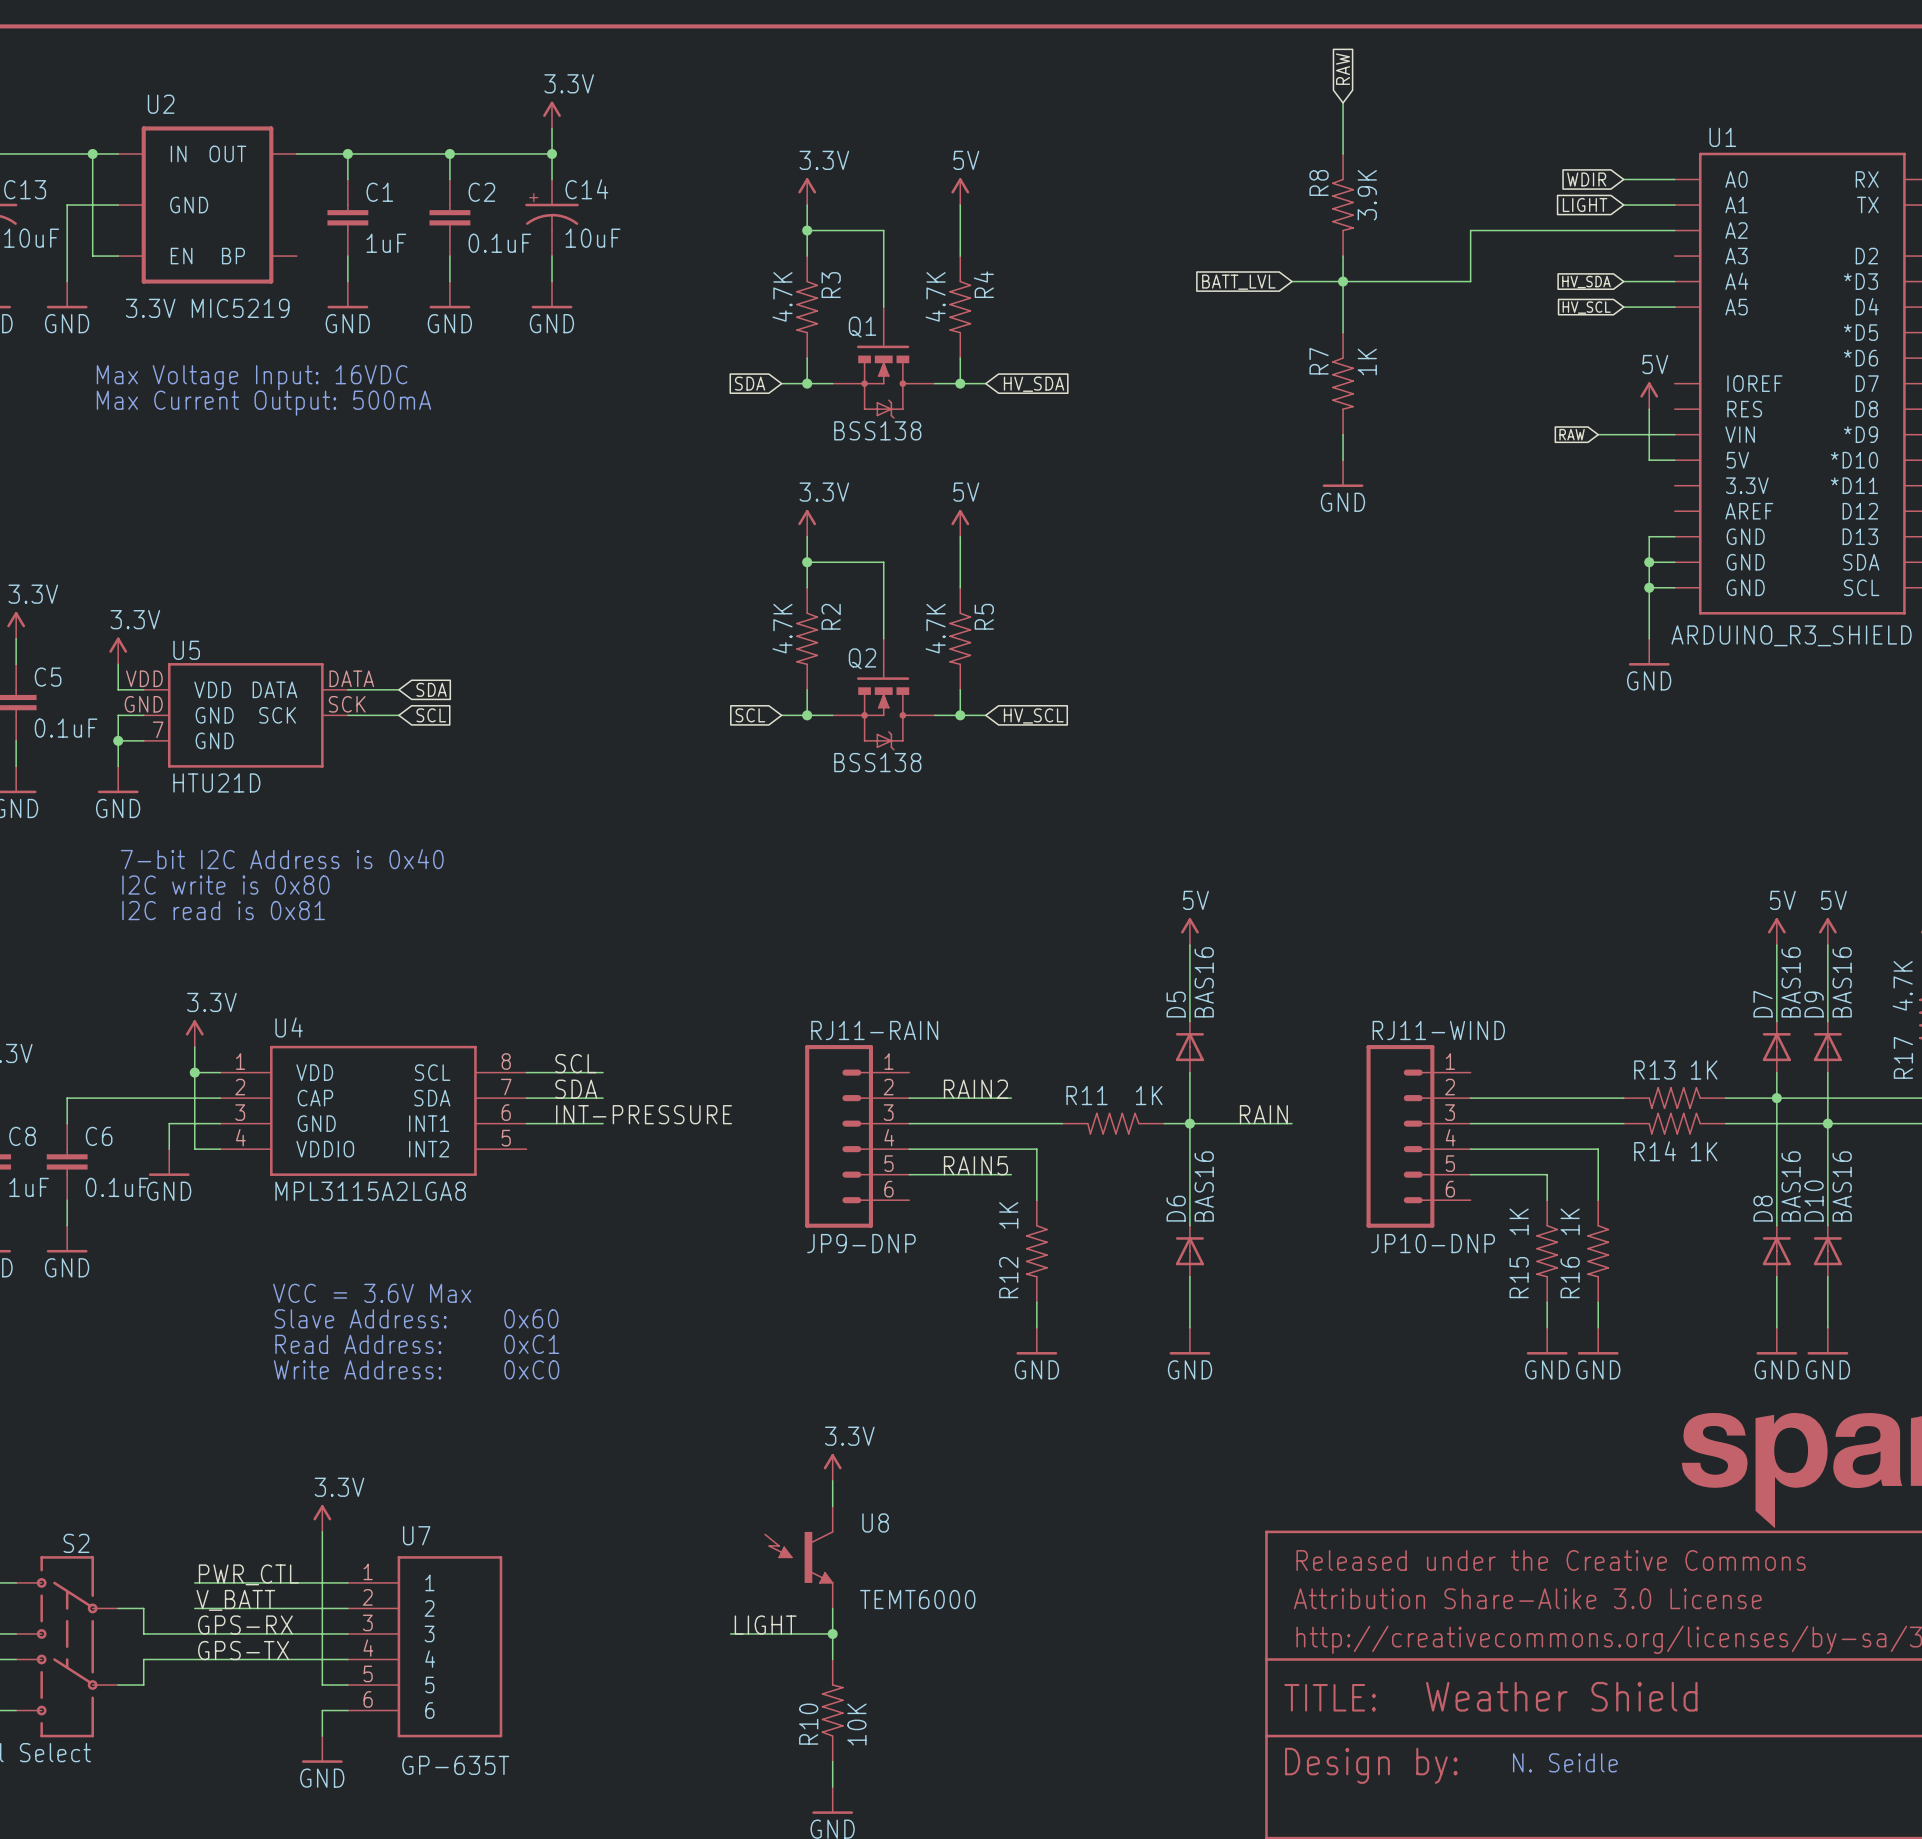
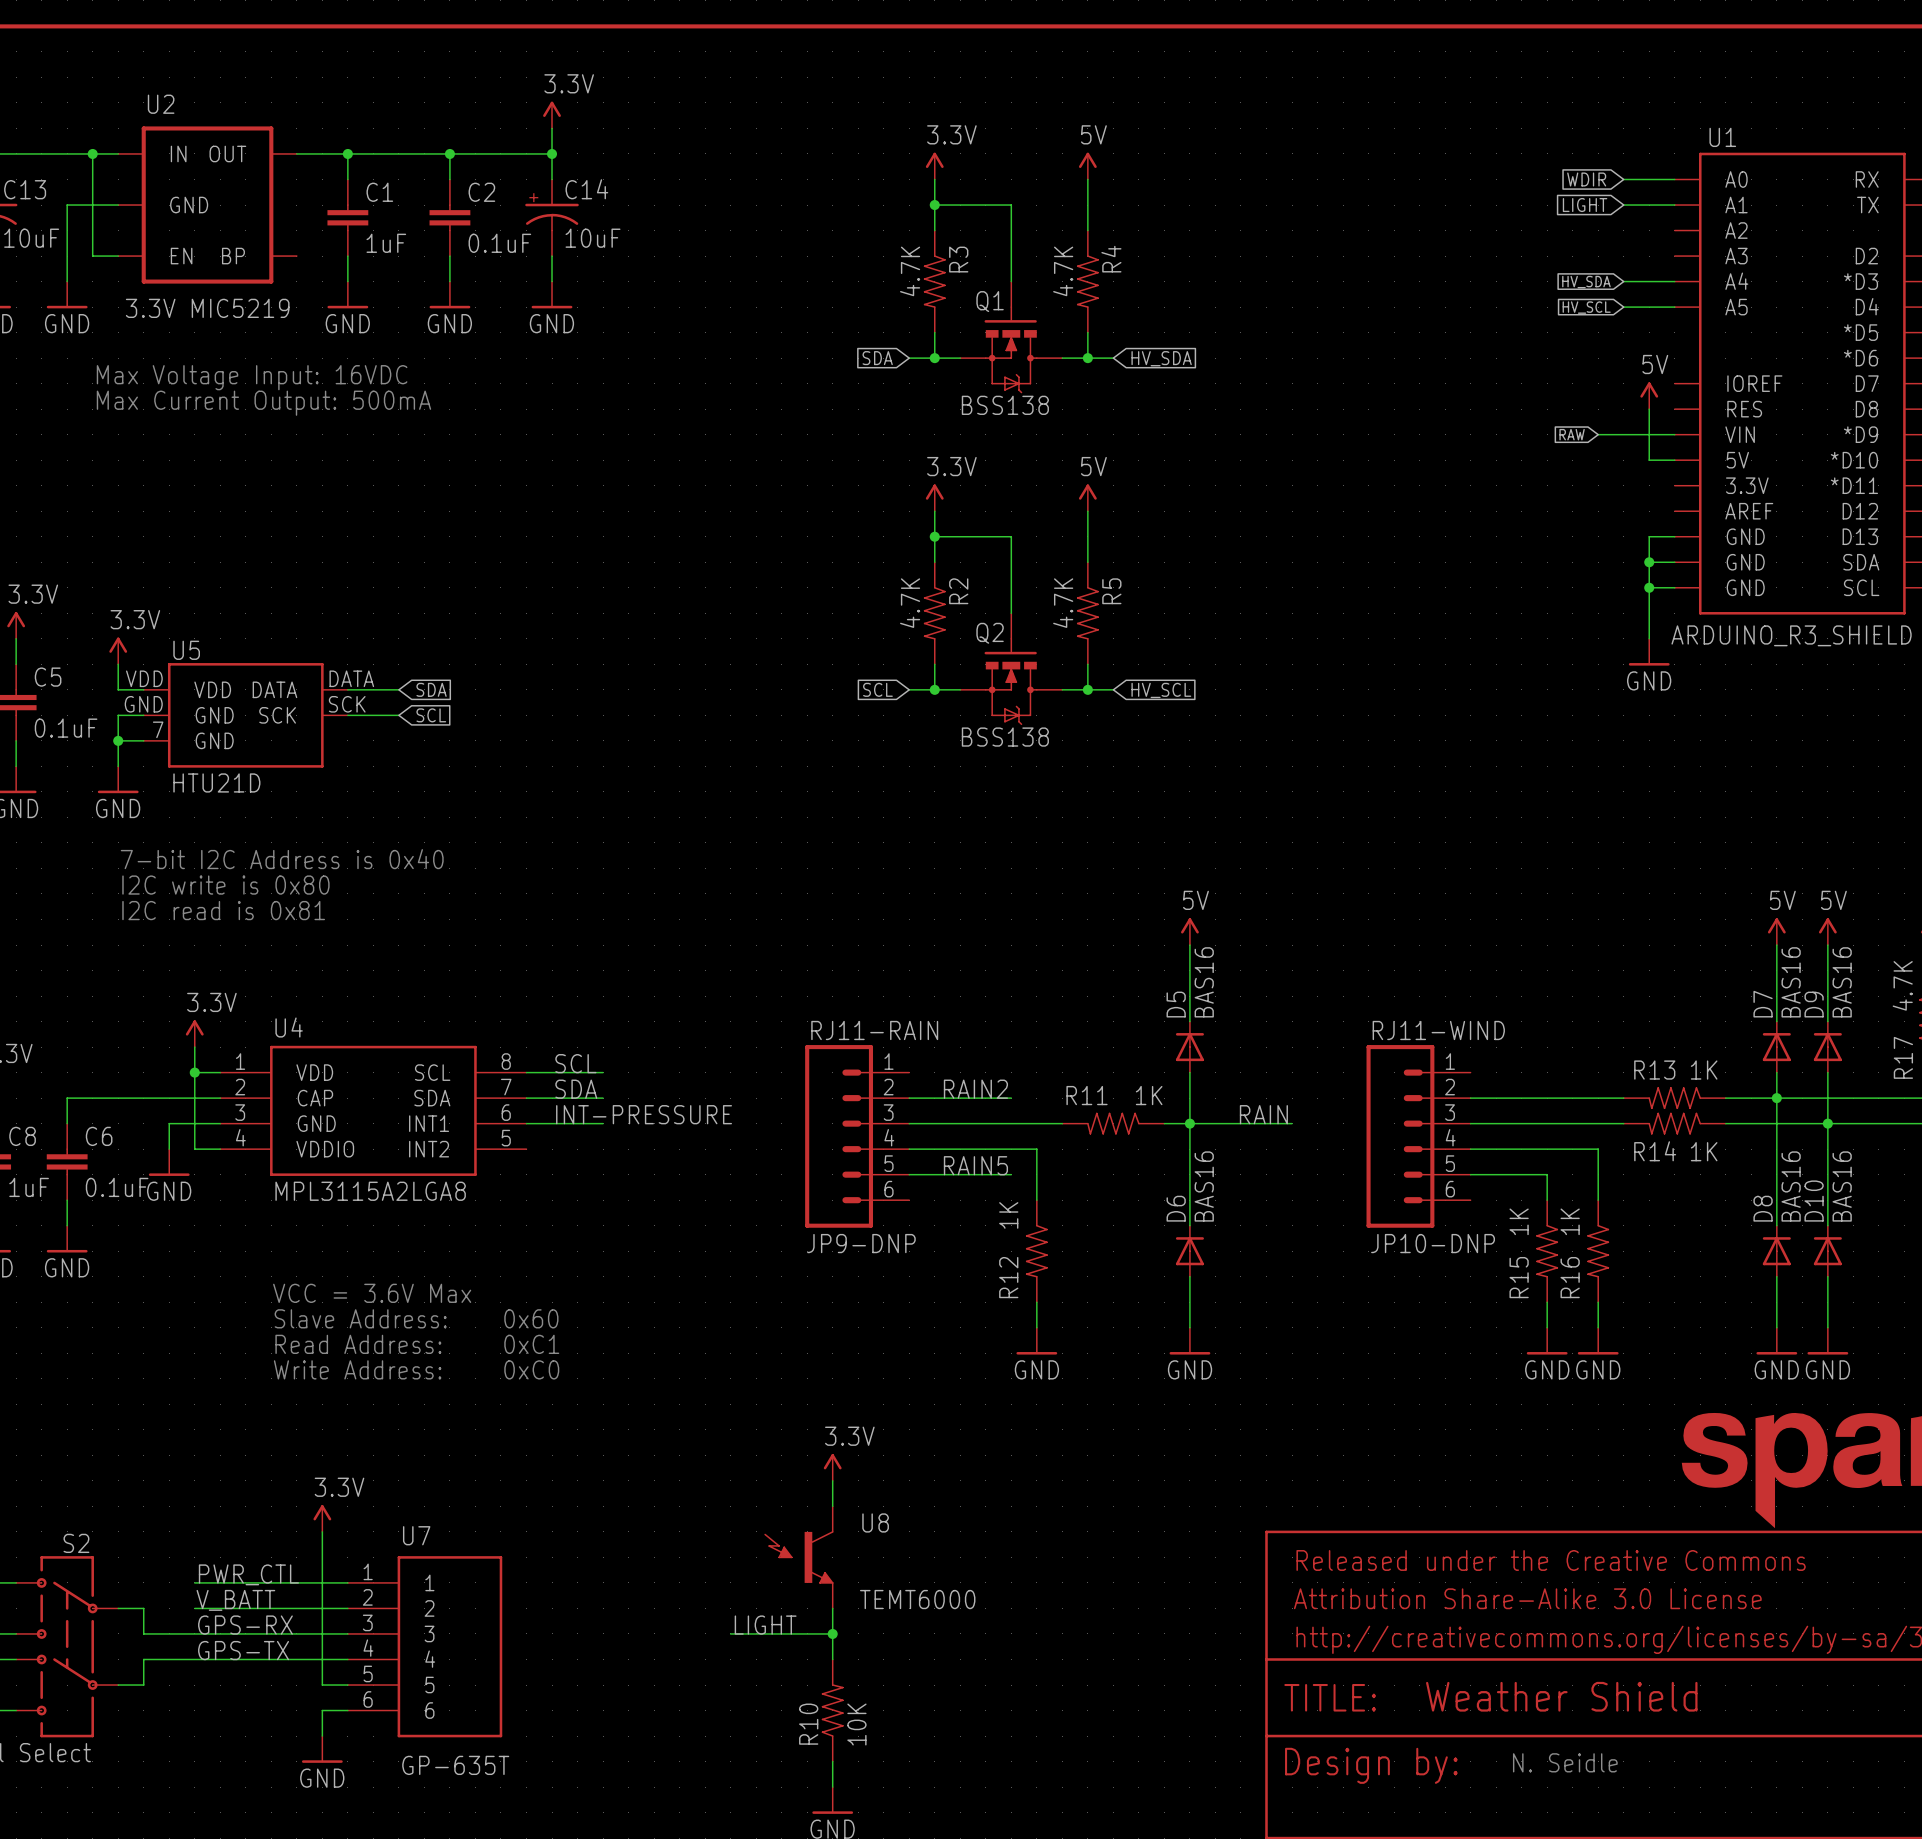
global label: RAW (1343, 69) -> none
wire: (1343, 102) (1343, 153) -> none
power symbol position: 3.3V (807, 191) -> 3.3V (934, 166)
power symbol position: 5V (960, 191) -> 5V (1087, 166)
wire: (807, 205) (807, 256) -> (934, 179) (934, 230)
junction: none -> (934, 205)
wire: (960, 205) (960, 256) -> (1087, 179) (1087, 230)
R8: 3.9K (1343, 205) -> none
wire: (807, 230) (883, 230) (883, 307) -> (934, 205) (1011, 205) (1011, 281)
junction: (807, 230) -> none
wire: (1674, 230) (1470, 230) (1470, 281) (1292, 281) -> none
wire: (1343, 256) (1343, 332) -> none
junction: (1343, 281) -> none
global label: BATT_LVL (1238, 282) -> none
R3 position: (807, 307) -> (934, 281)
R4 position: (960, 307) -> (1087, 281)
wire: none -> (1087, 332) (1087, 358)
wire: (807, 358) (807, 383) -> (934, 332) (934, 358)
wire: (960, 358) (960, 383) -> (960, 358) (909, 358)
junction: none -> (1087, 358)
Q1 position: (883, 362) -> (1011, 337)
global label position: SDA (750, 383) -> SDA (877, 358)
wire: (781, 383) (832, 383) -> none
junction: (807, 383) -> none
wire: (934, 383) (985, 383) -> (1062, 358) (1113, 358)
junction position: (960, 383) -> (934, 358)
R7: 1K (1343, 383) -> none
global label position: HV_SDA (1034, 384) -> HV_SDA (1161, 358)
wire: (1343, 434) (1343, 460) -> none
power symbol: GND (1343, 473) -> none
power symbol position: 3.3V (807, 523) -> 3.3V (934, 497)
power symbol position: 5V (960, 523) -> 5V (1087, 497)
wire: (807, 536) (807, 587) -> (934, 511) (934, 562)
junction: none -> (934, 536)
wire: (960, 536) (960, 587) -> (1087, 511) (1087, 562)
wire: (807, 562) (883, 562) (883, 638) -> (934, 536) (1011, 536) (1011, 613)
junction: (807, 562) -> none
R2 position: (807, 638) -> (934, 613)
R5 position: (960, 638) -> (1087, 613)
wire: none -> (1087, 664) (1087, 689)
wire: (807, 689) (807, 715) -> (934, 664) (934, 689)
wire: (960, 689) (960, 715) -> (960, 689) (909, 689)
junction: none -> (1087, 689)
Q2 position: (883, 694) -> (1011, 669)
global label position: SCL (750, 715) -> SCL (877, 689)
wire: (781, 715) (832, 715) -> none
junction: (807, 715) -> none
wire: (934, 715) (985, 715) -> (1062, 689) (1113, 689)
junction position: (960, 715) -> (934, 689)
global label position: HV_SCL (1033, 715) -> HV_SCL (1161, 690)

